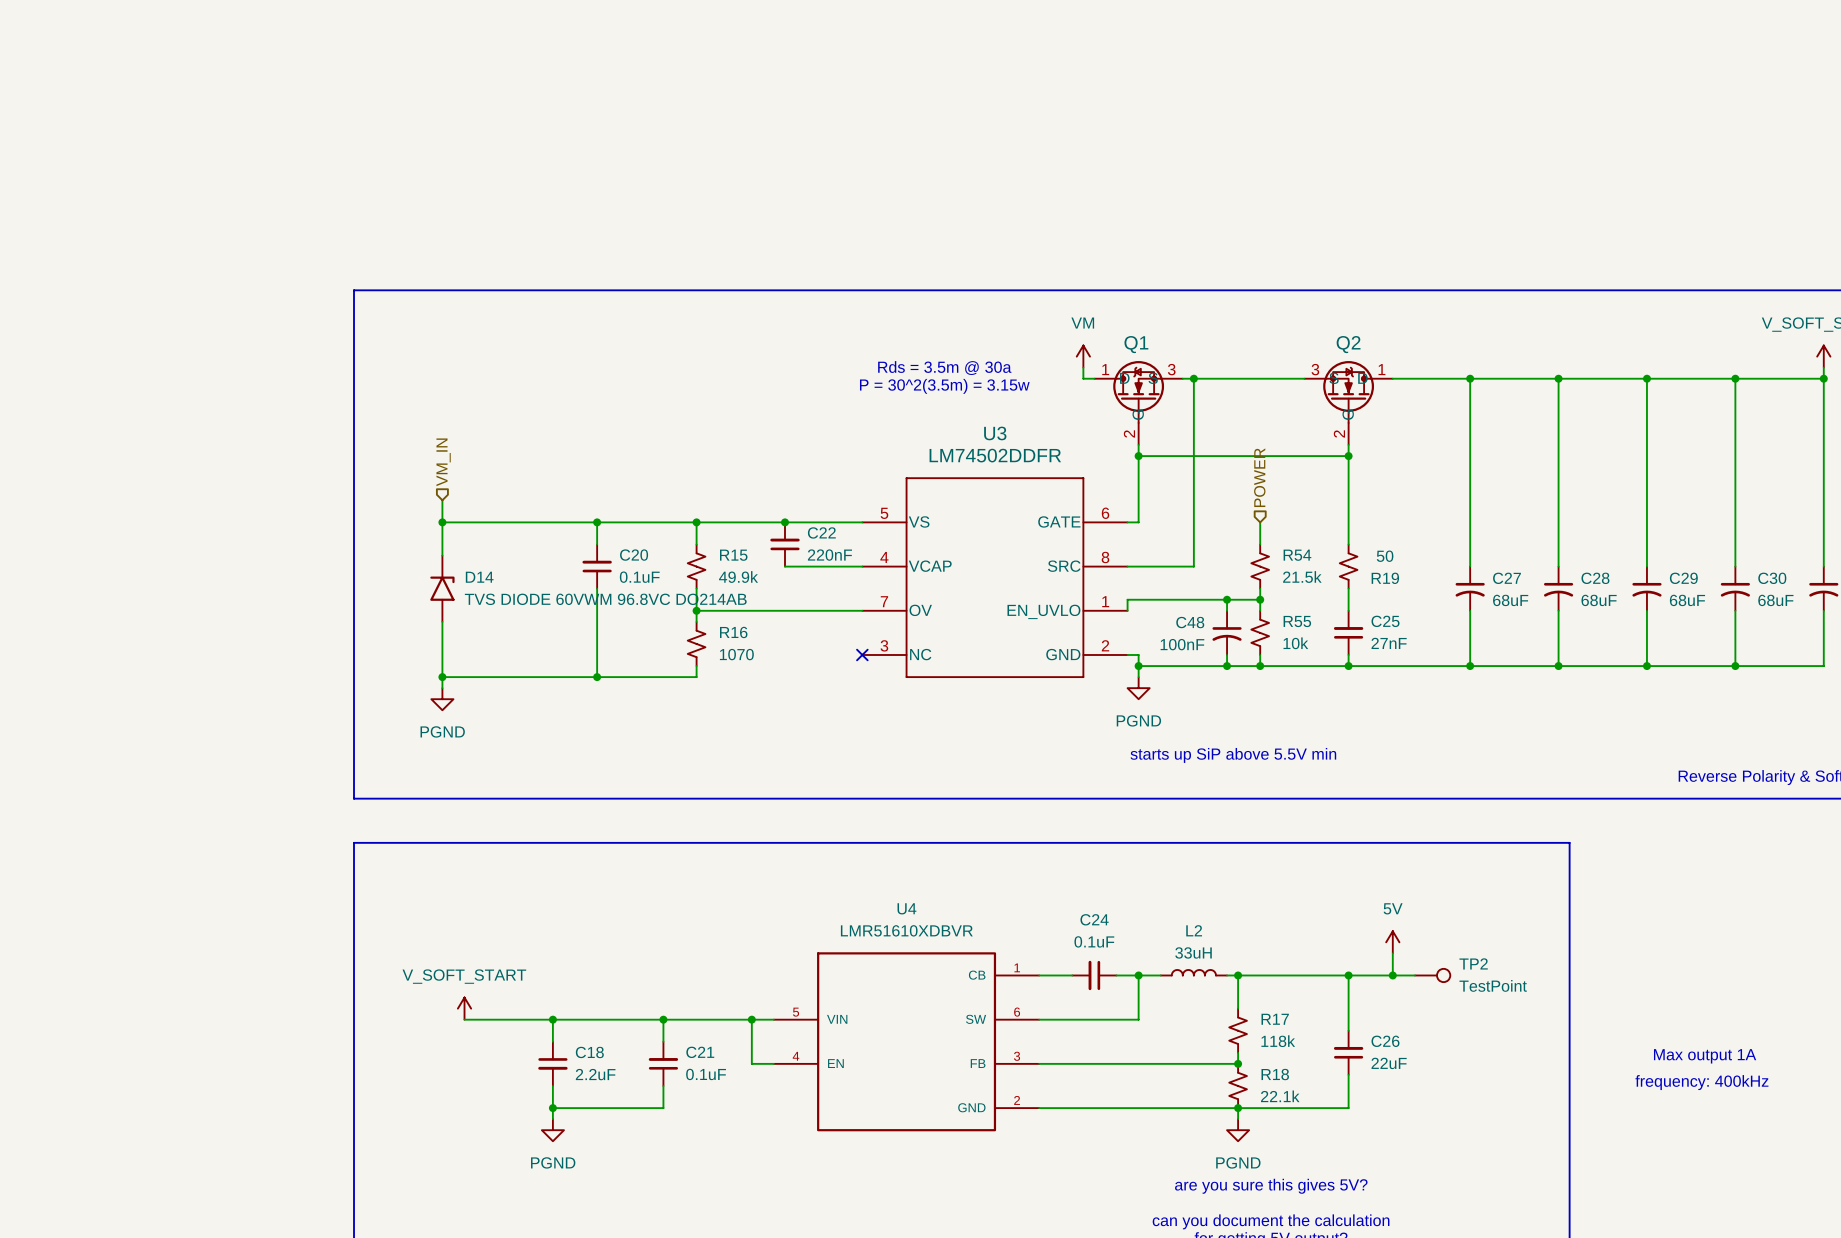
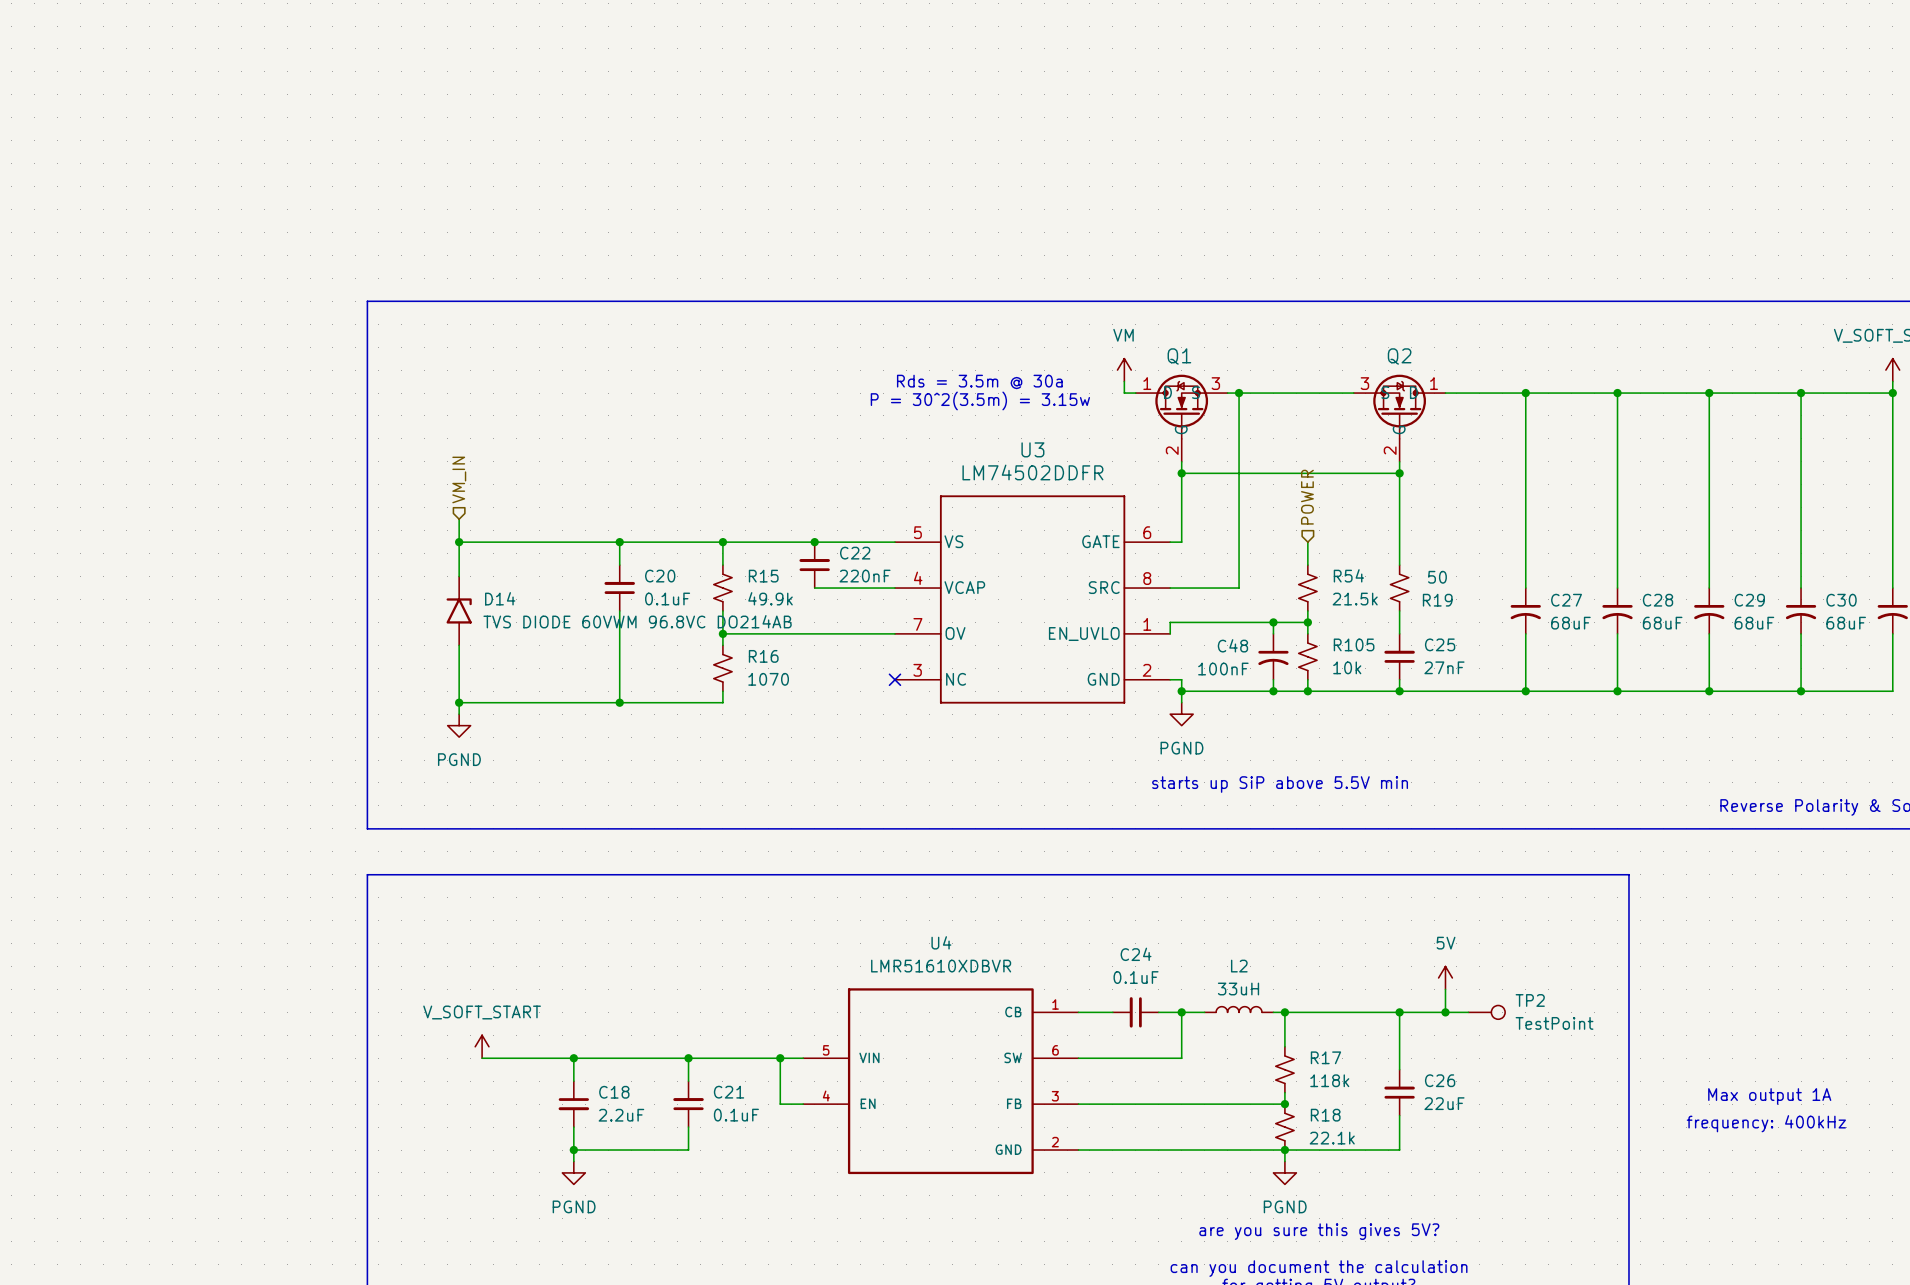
R55 name: R55 (1297, 621) -> R105 (1354, 644)

